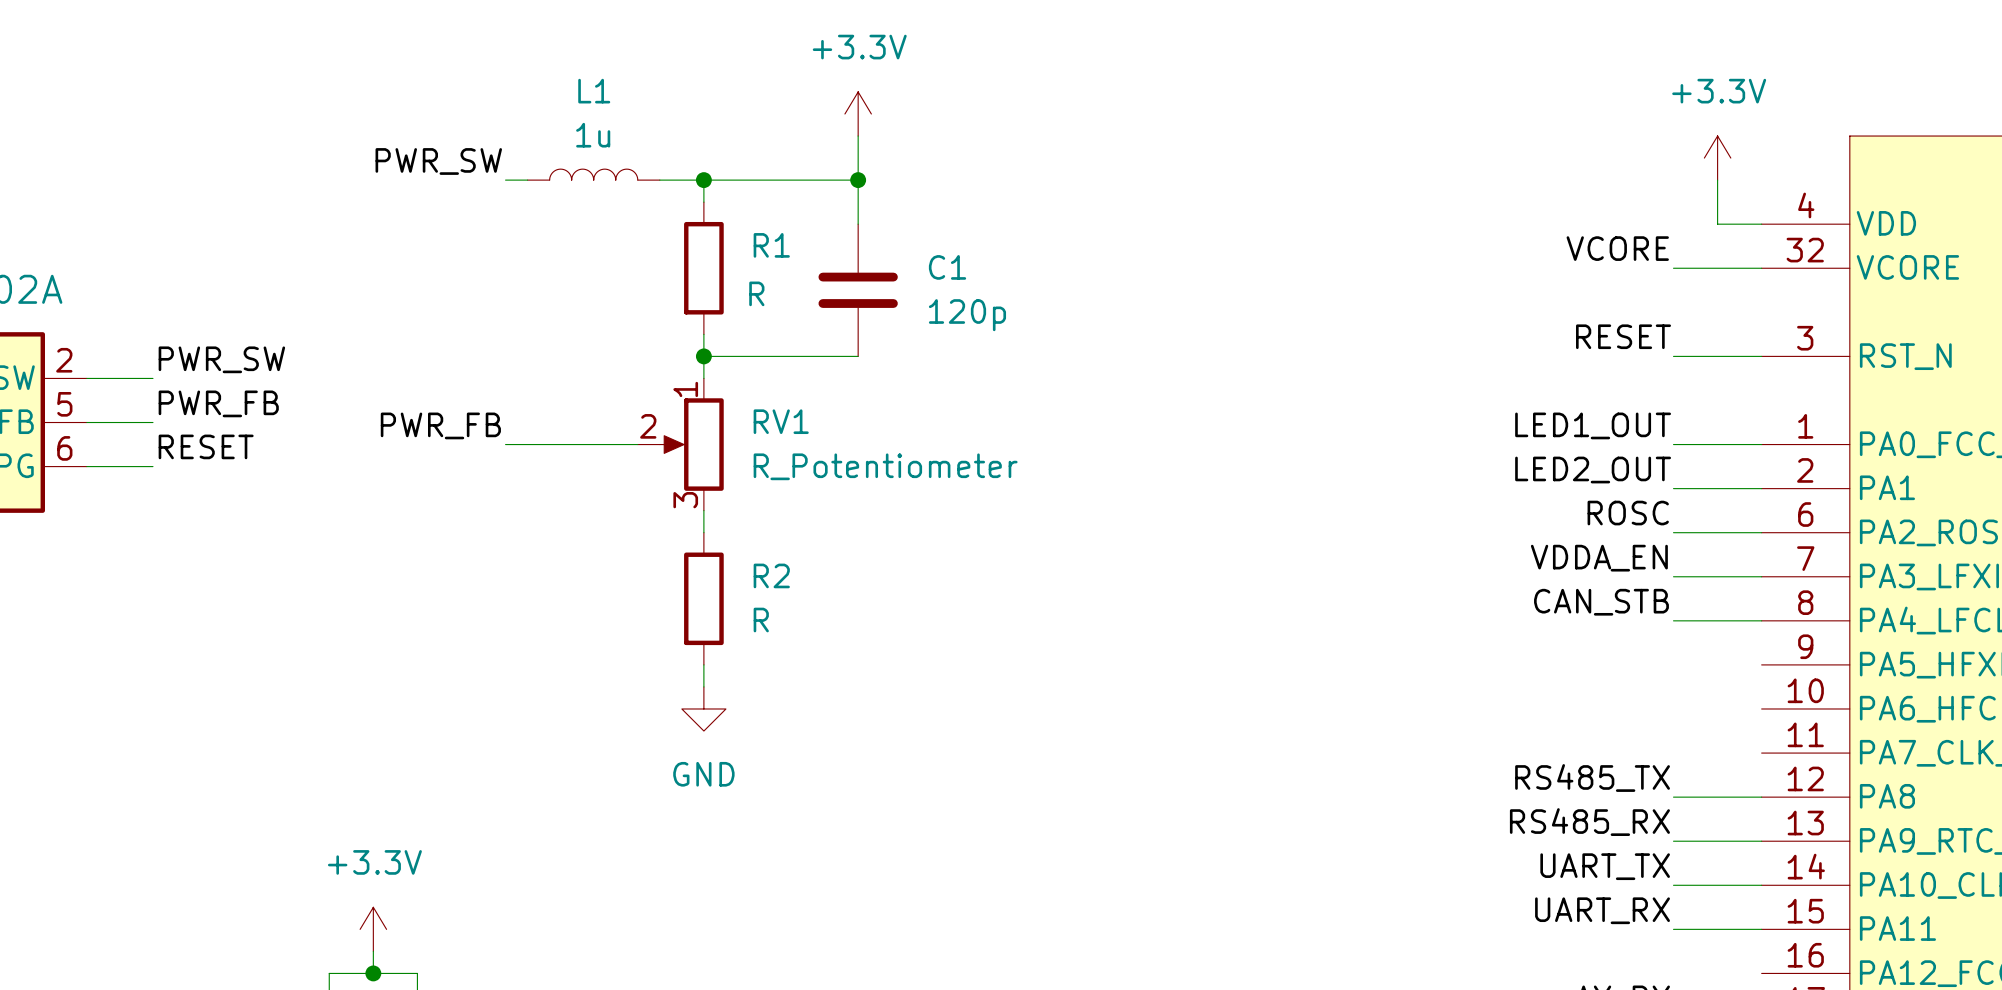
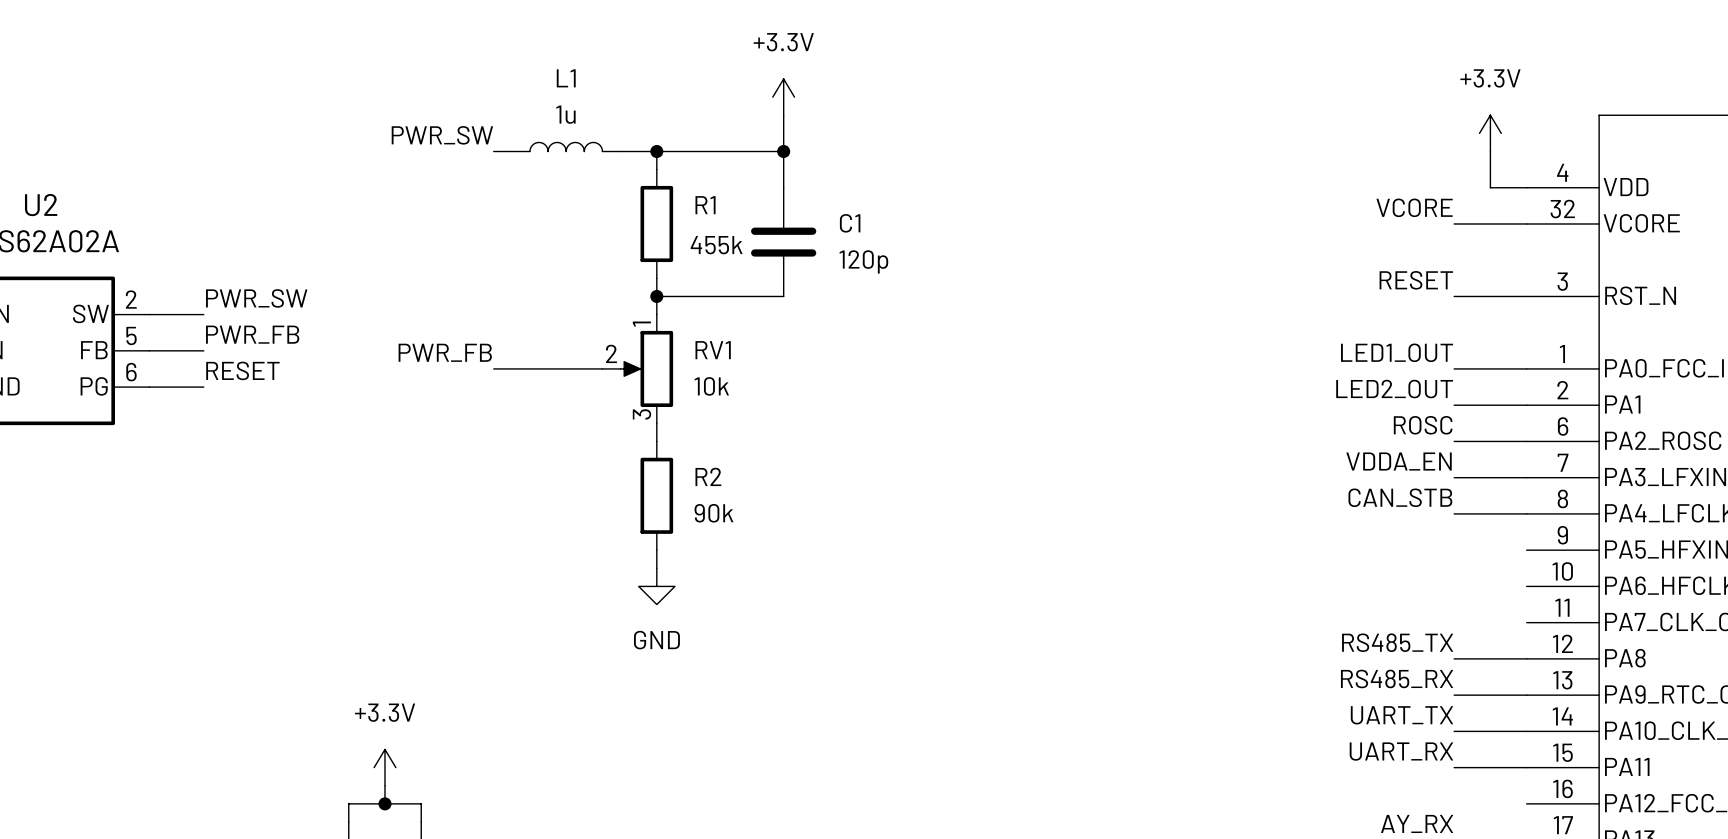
R1 value: R (756, 293) -> 455k (716, 245)
RV1 value: R_Potentiometer (885, 466) -> 10k (711, 386)
R2 value: R (761, 620) -> 90k (713, 513)

